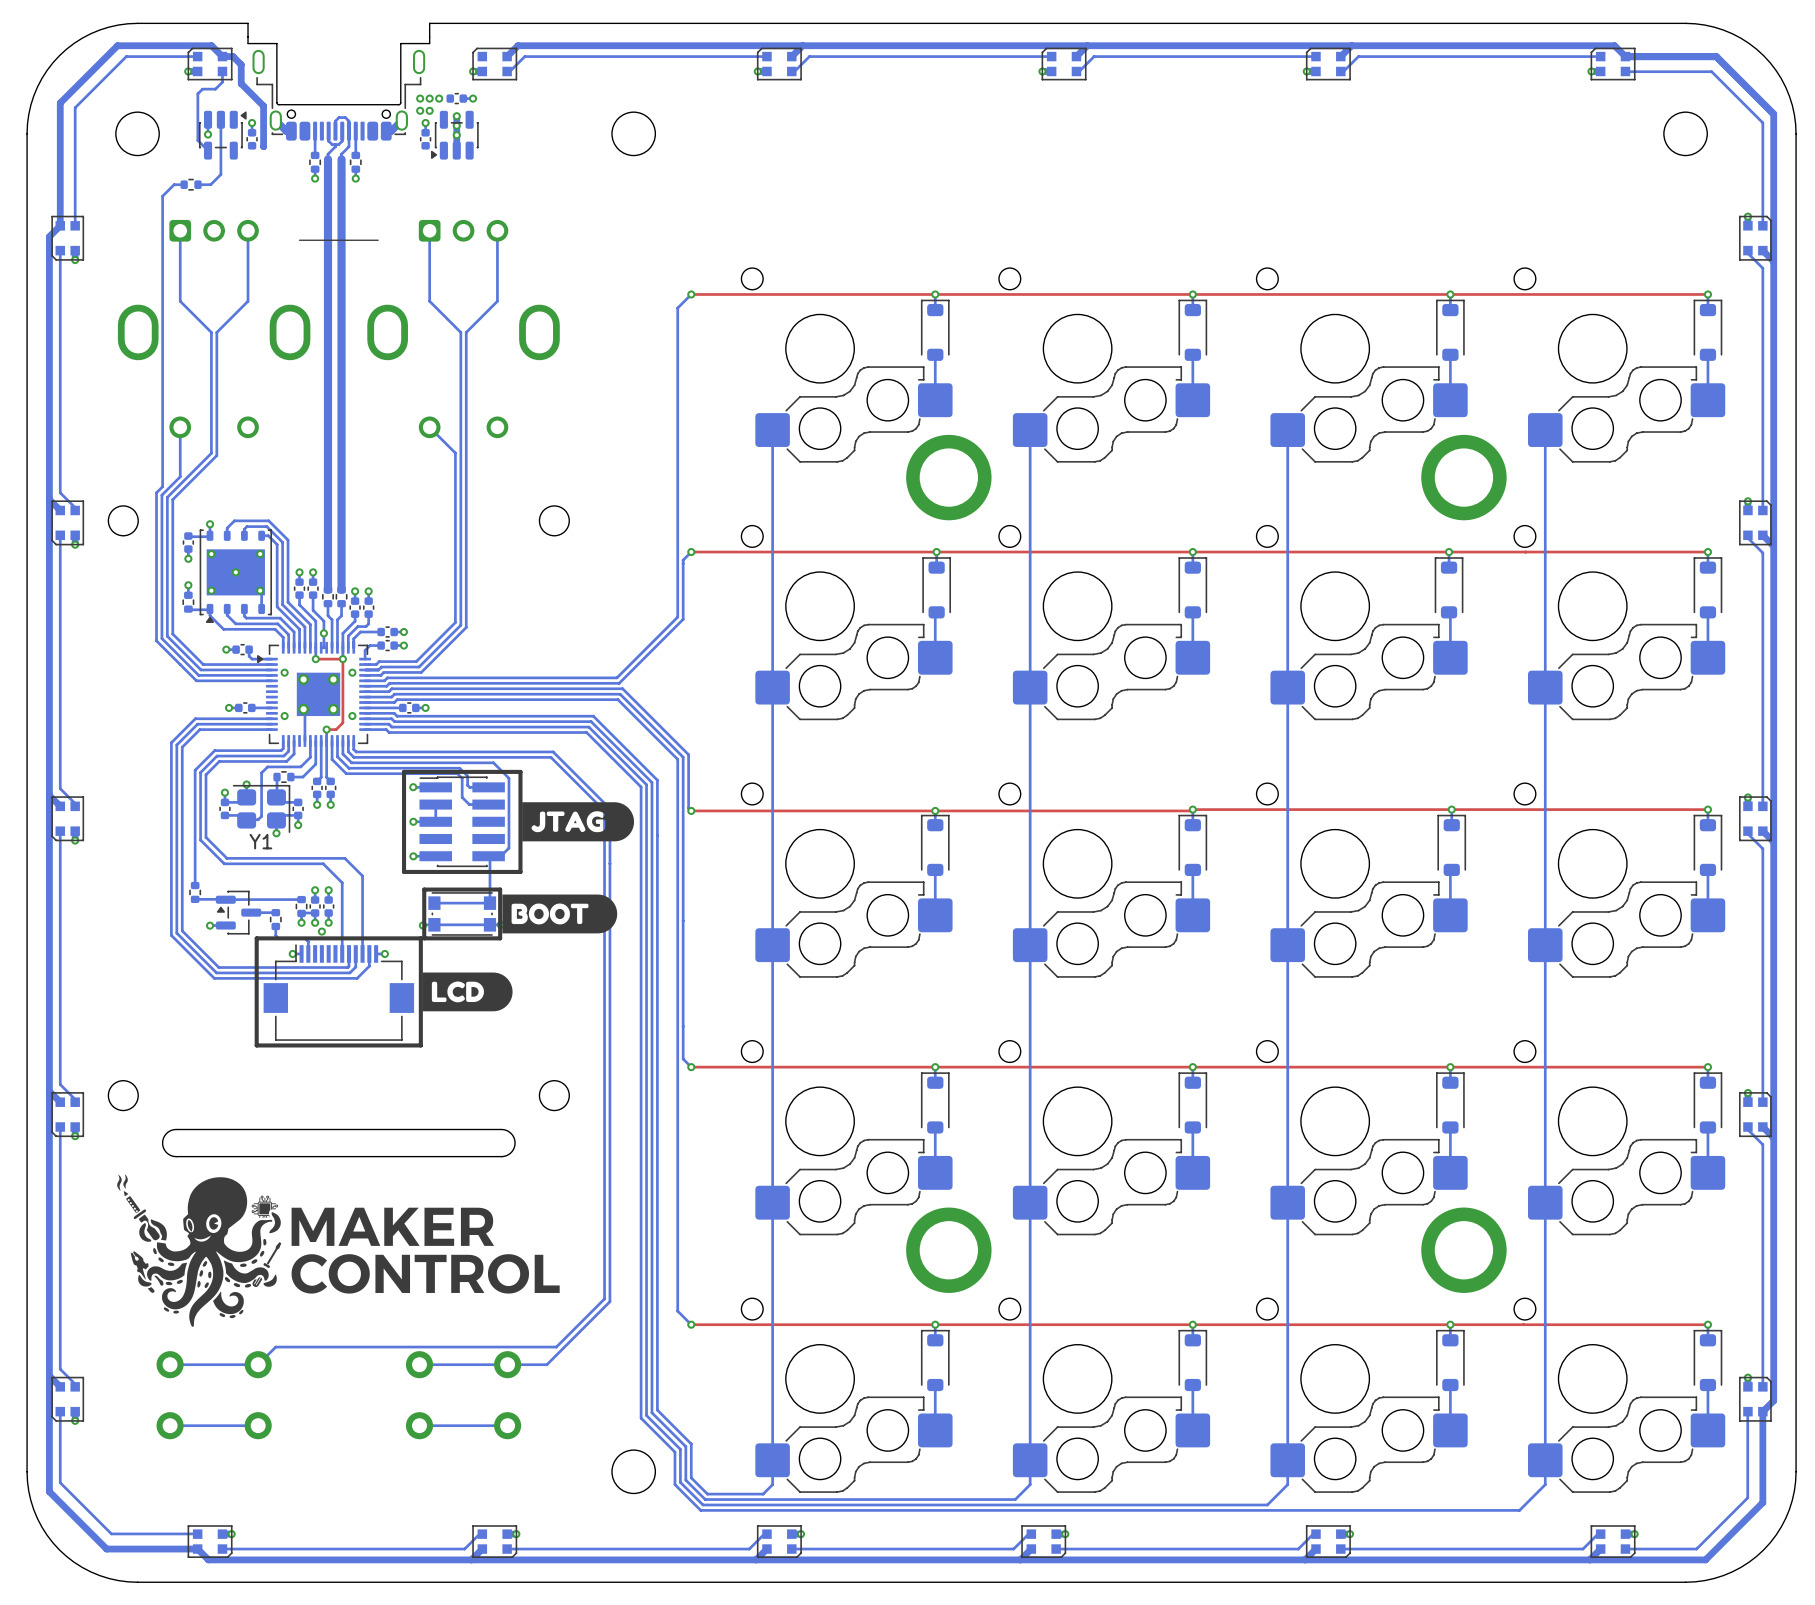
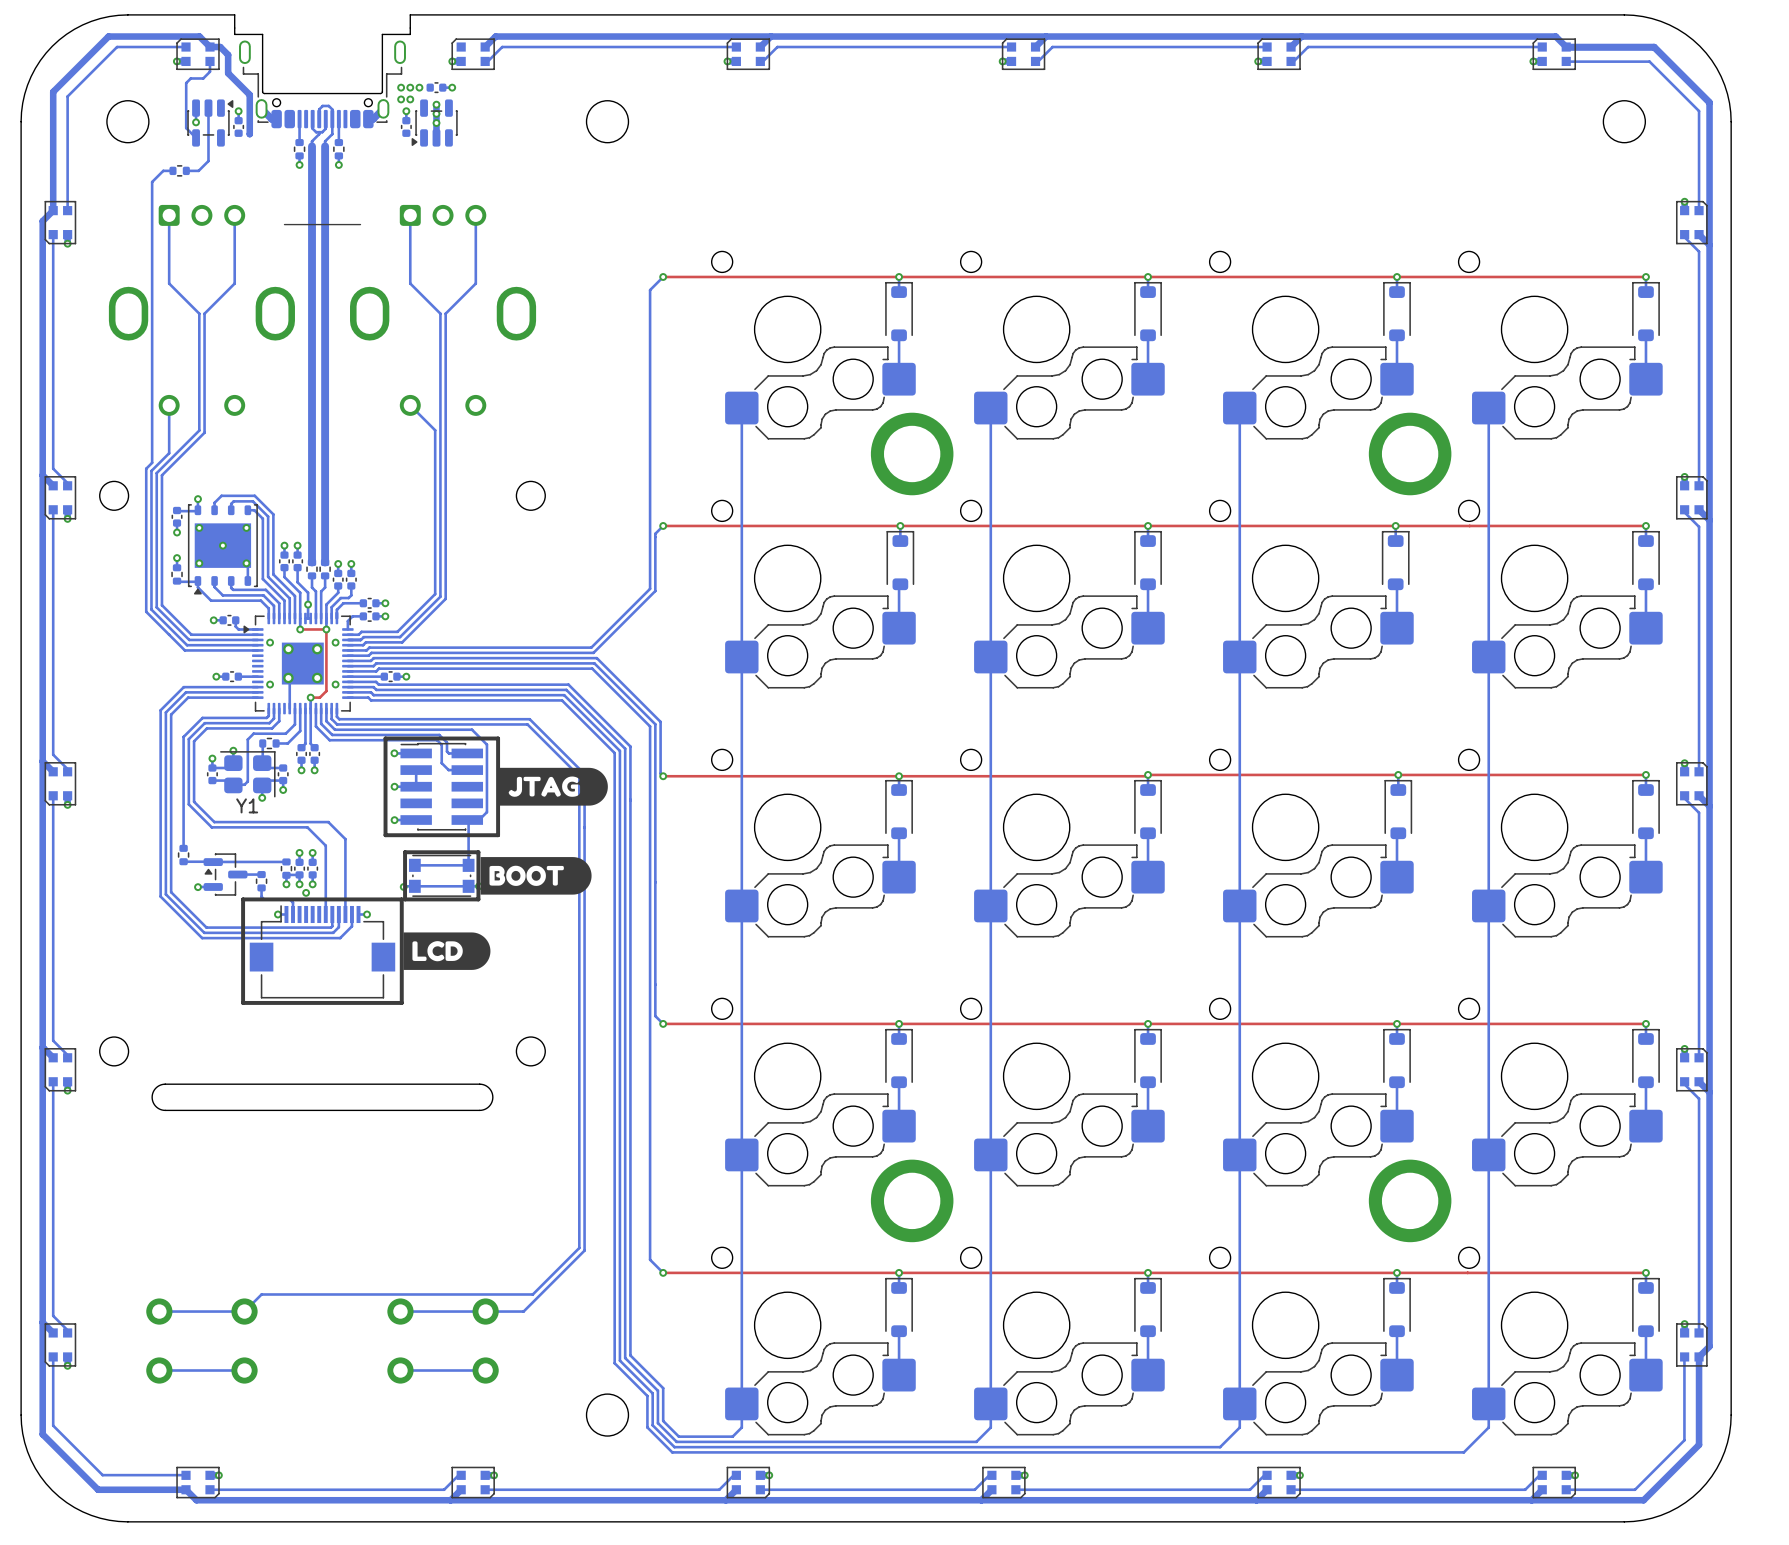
drawing: [117, 1174, 560, 1327] -> none

